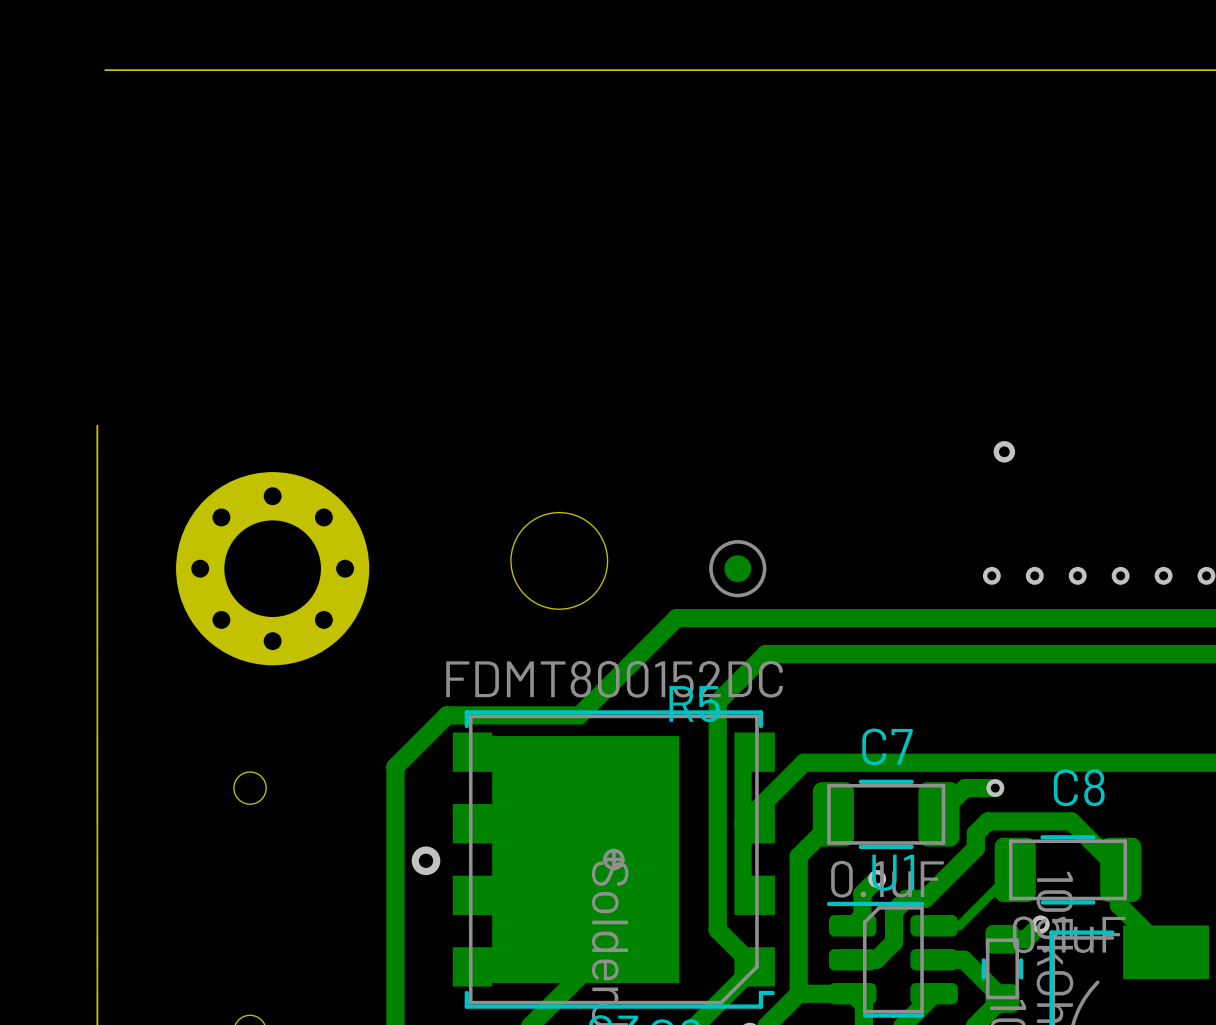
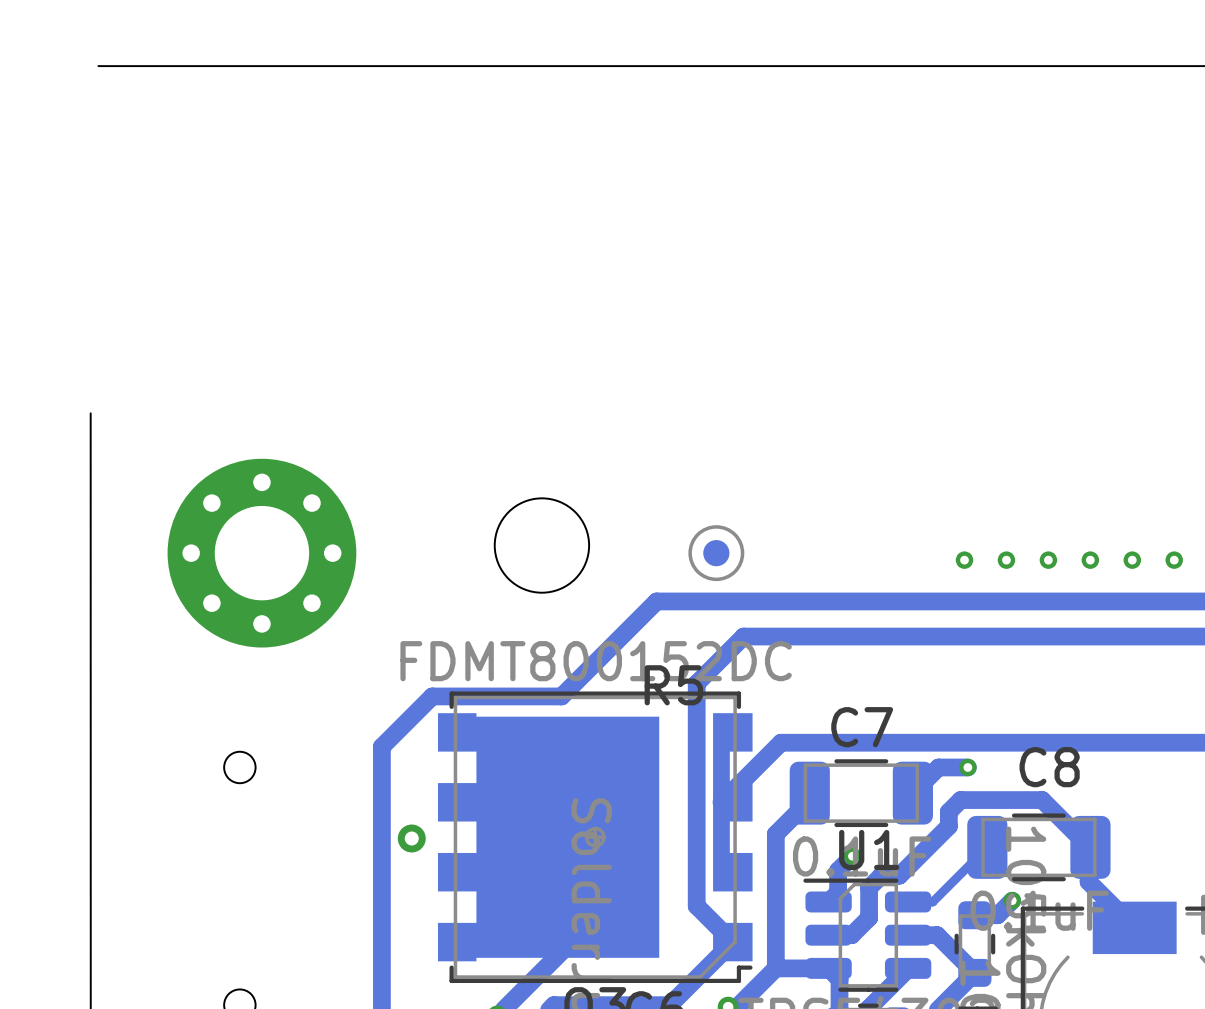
via: (1004, 451) -> none

